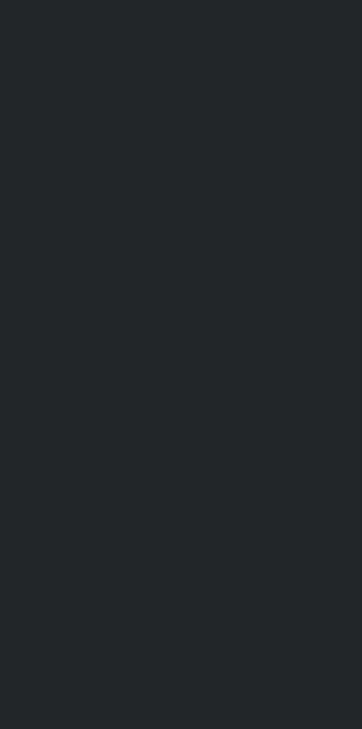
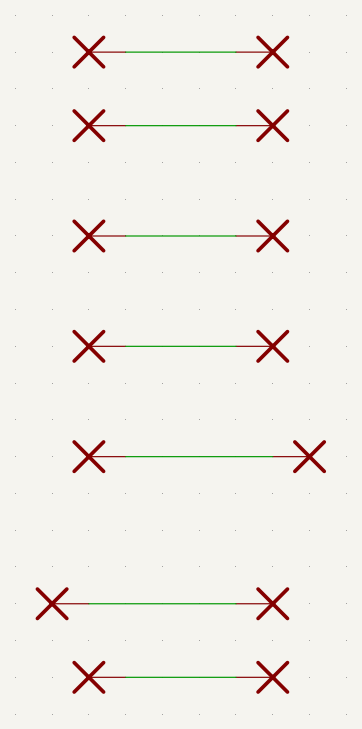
part: none -> (99, 52)
wire: none -> (125, 52) (235, 52)
part: none -> (262, 52)
part: none -> (99, 125)
wire: none -> (125, 125) (235, 125)
part: none -> (262, 125)
part: none -> (99, 235)
wire: none -> (125, 235) (235, 235)
part: none -> (262, 235)
part: none -> (99, 346)
wire: none -> (125, 346) (235, 346)
part: none -> (262, 346)
part: none -> (99, 456)
wire: none -> (125, 456) (272, 456)
part: none -> (299, 456)
part: none -> (62, 603)
wire: none -> (88, 603) (235, 603)
part: none -> (262, 603)
part: none -> (99, 677)
wire: none -> (125, 677) (235, 677)
part: none -> (262, 677)

